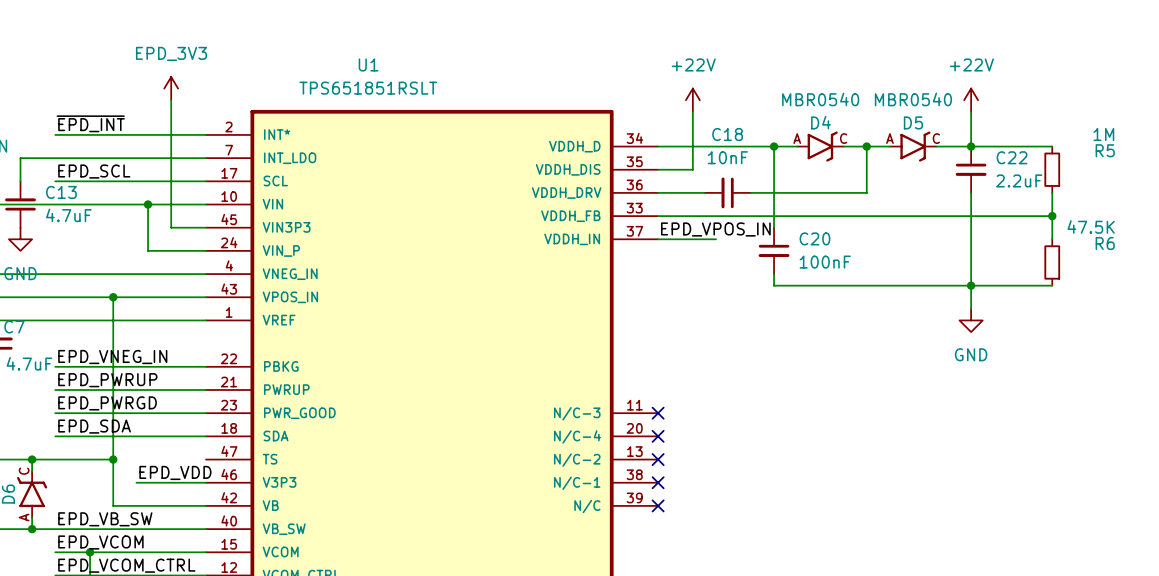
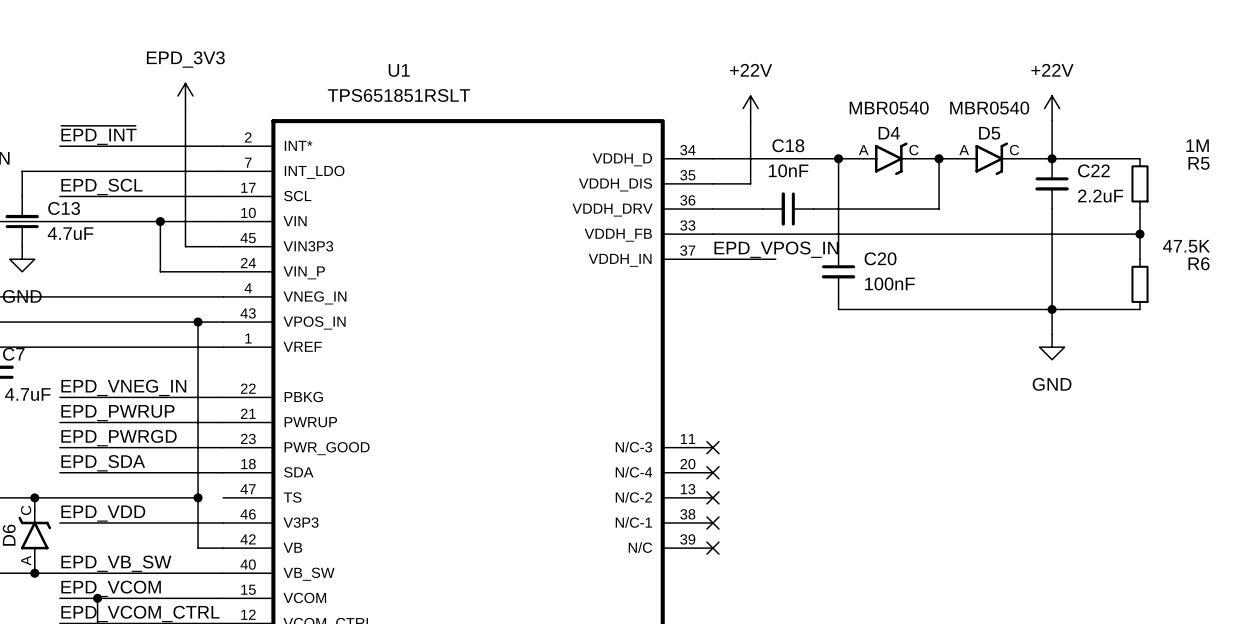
wire: (113, 297) (113, 505) (182, 505) -> (198, 322) (198, 548)
junction: (113, 297) -> none
junction: none -> (198, 322)
wire: none -> (122, 497) (198, 497)
junction: (113, 459) -> none
junction: none -> (198, 497)
label position: EPD_VDD (175, 472) -> EPD_VDD (103, 513)
wire: none -> (59, 522) (147, 522)

